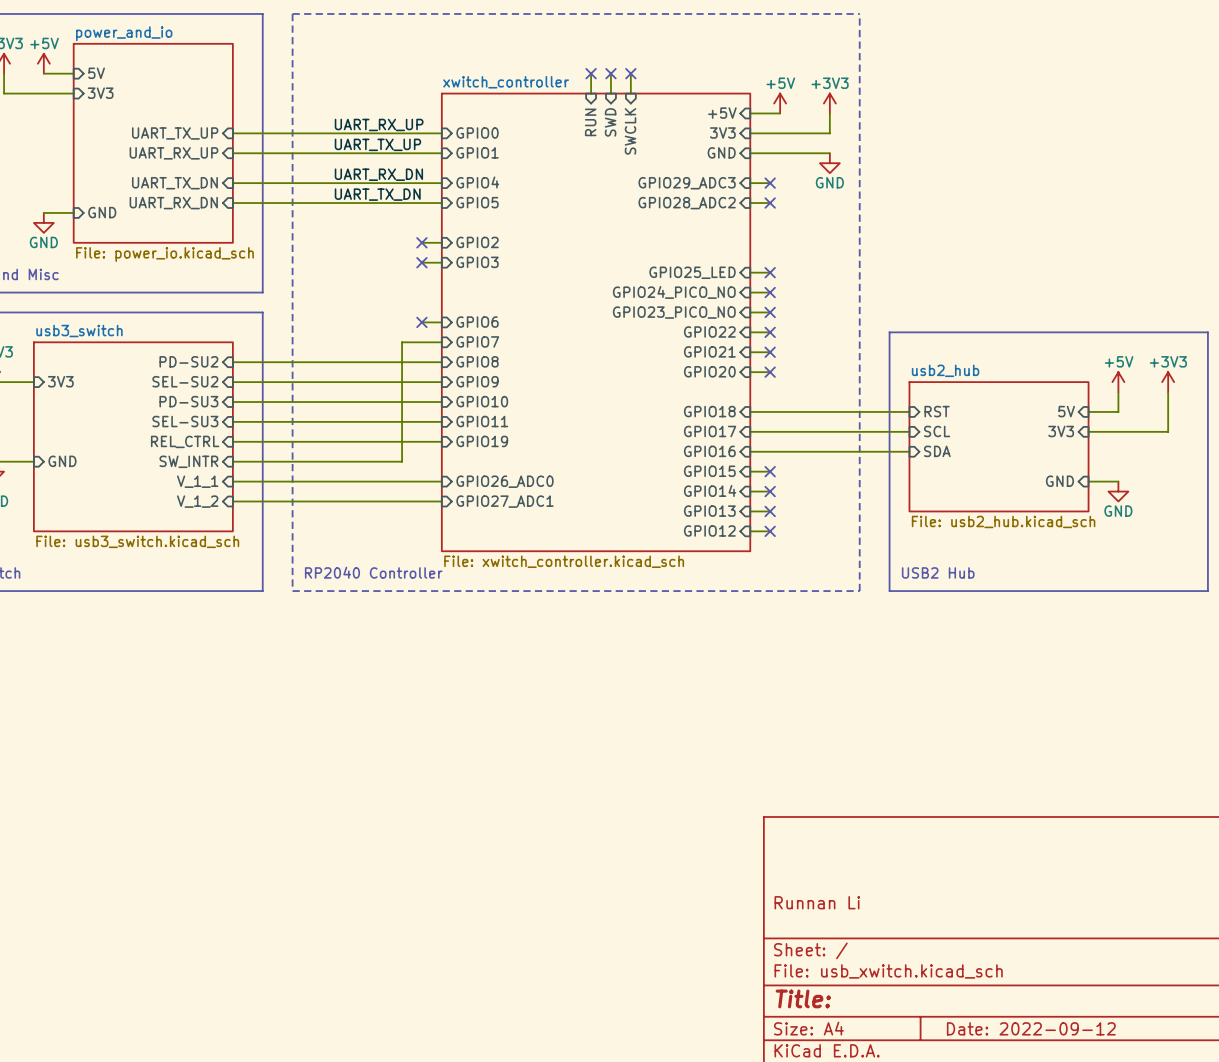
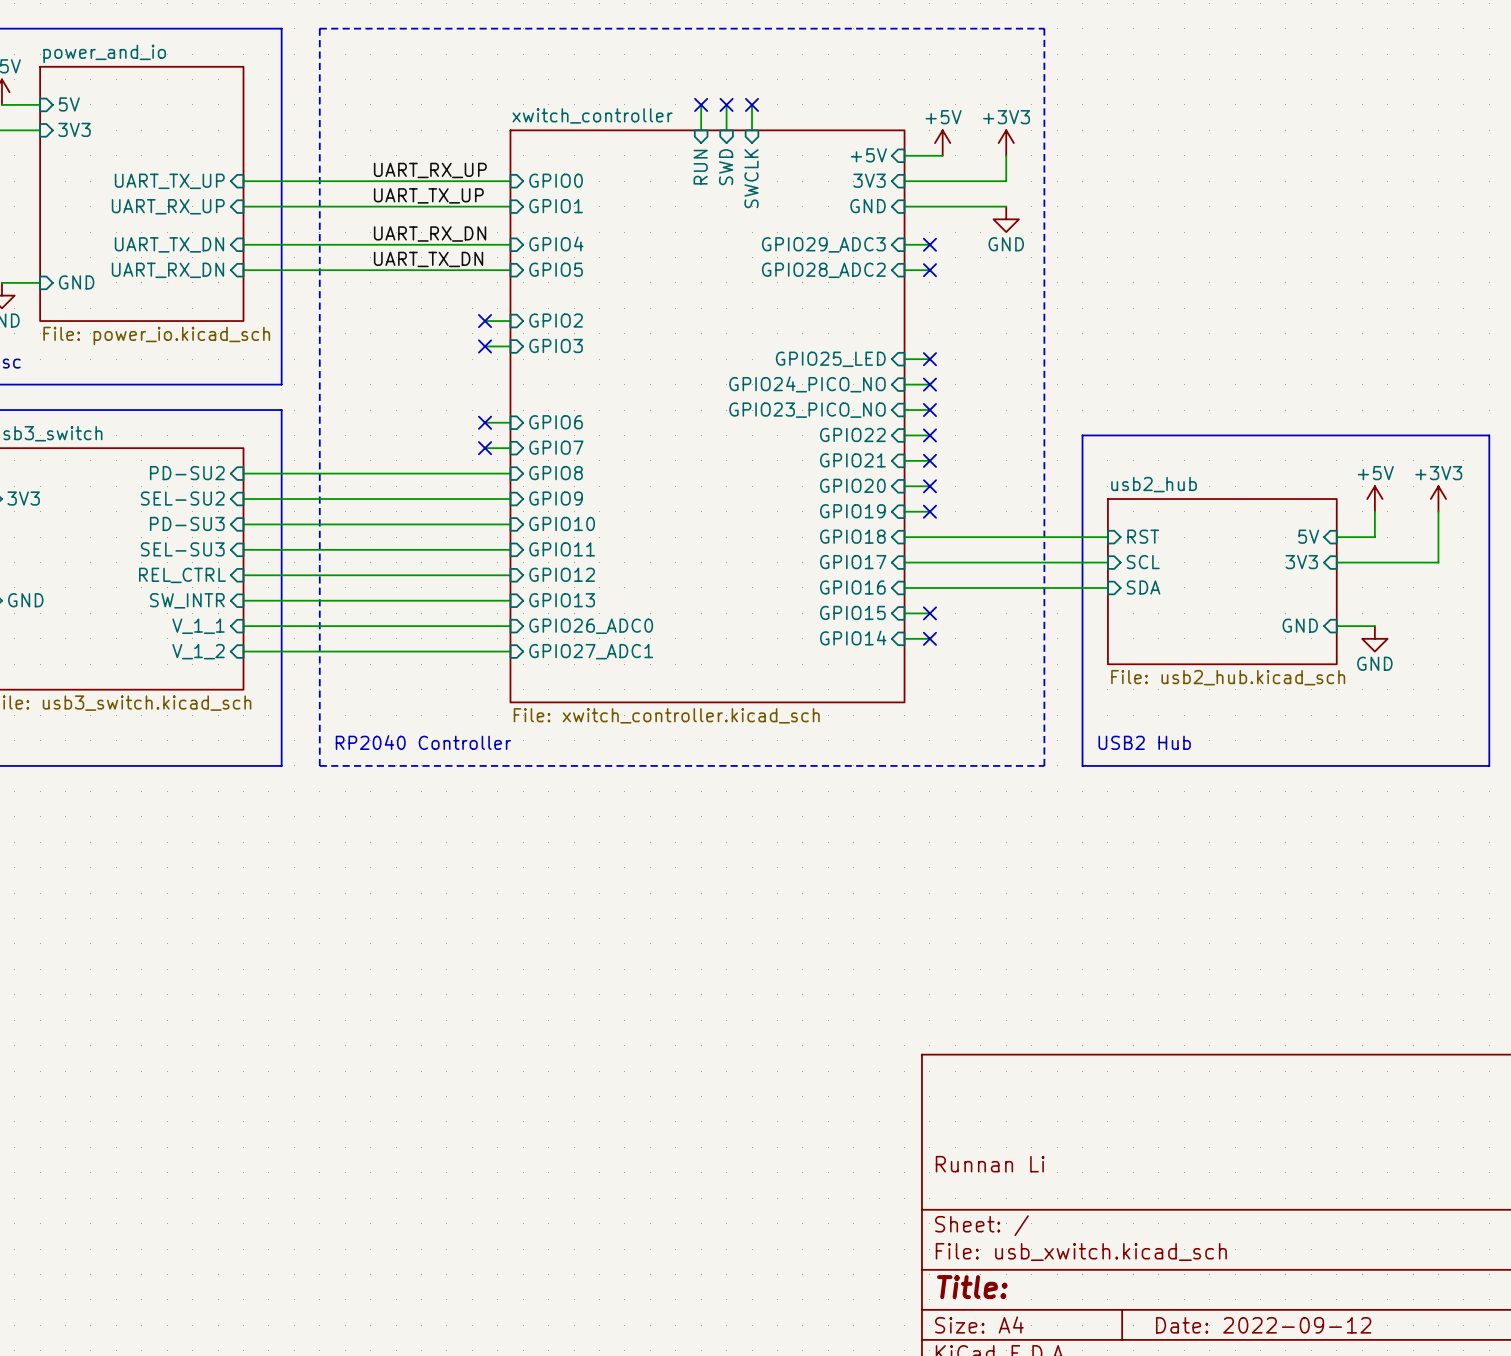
sheet xwitch_controller shape: [441, 92, 751, 552] -> [509, 129, 906, 704]
wire: (421, 342) (402, 342) (402, 461) -> (510, 600) (459, 600)
no-connect mark: none -> (485, 448)
sheet pin: none -> GPIO19 (852, 511)
no-connect mark: none -> (929, 511)
sheet pin: GPIO19 (482, 441) -> GPIO12 (562, 574)
sheet pin: none -> GPIO13 (562, 600)
sheet pin: GPIO13 (709, 511) -> none
wire: (750, 511) (770, 511) -> (904, 511) (929, 511)
no-connect mark: (770, 511) -> none
sheet pin: GPIO12 (709, 530) -> none
wire: (750, 531) (770, 531) -> none
no-connect mark: (770, 531) -> none

